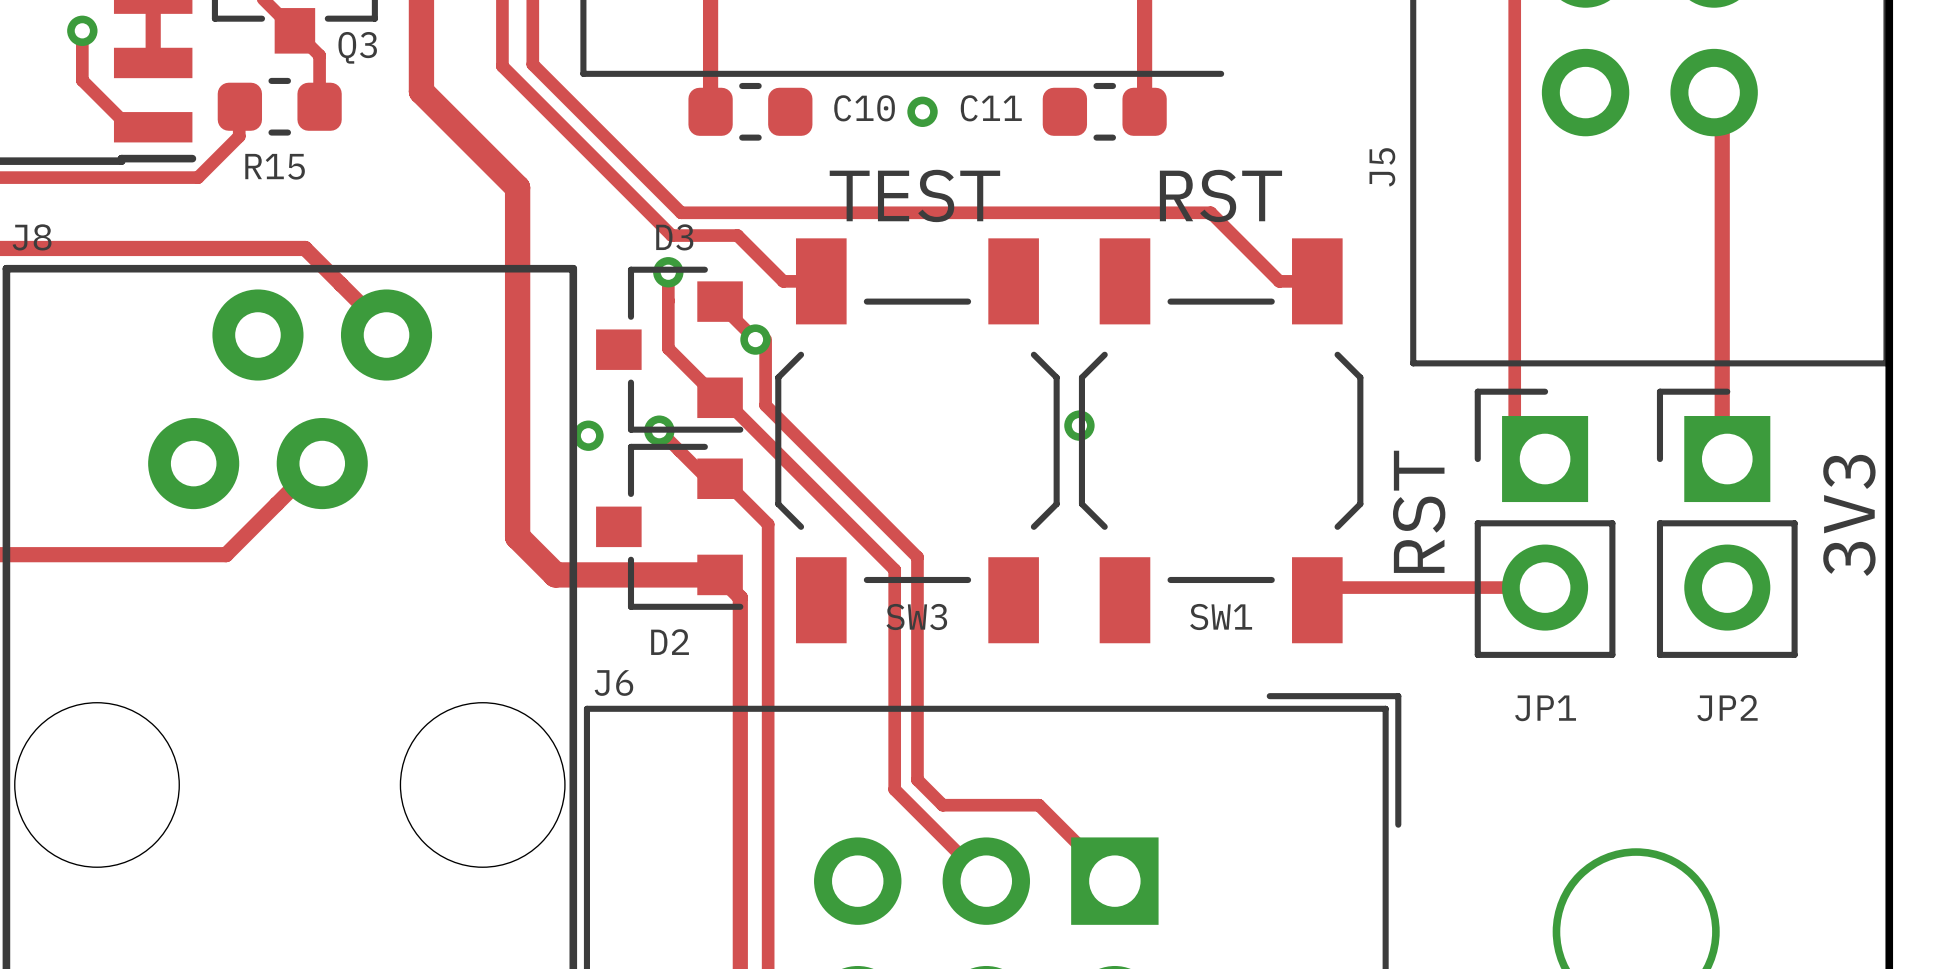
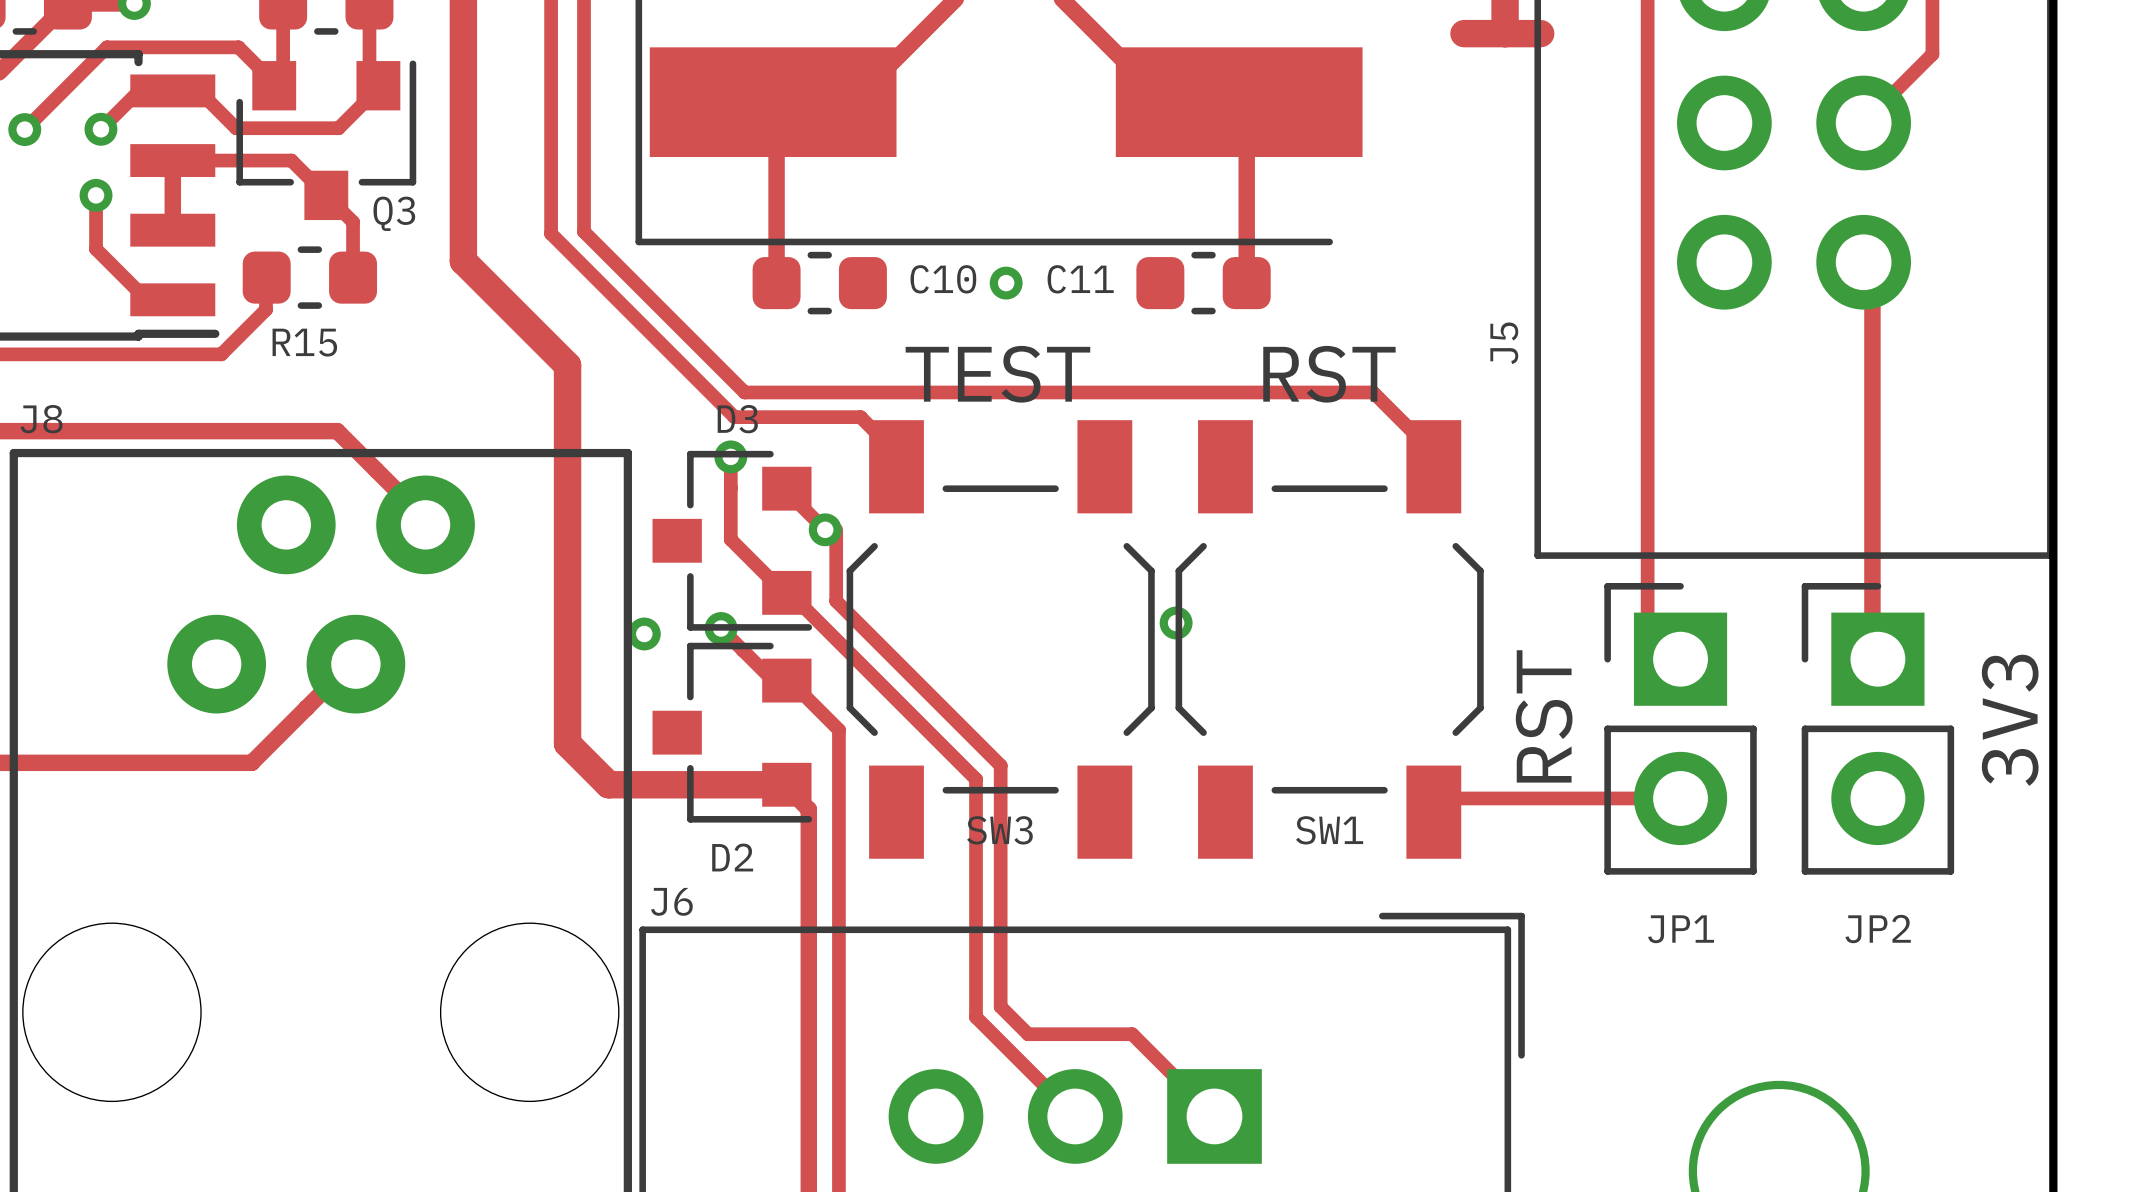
track: (1210, 212) (1279, 281) (1317, 281) -> (1318, 392) (1373, 392) (1433, 453) (1433, 466)
track: (737, 235) (783, 281) (821, 281) -> (805, 417) (860, 417) (896, 453) (896, 466)

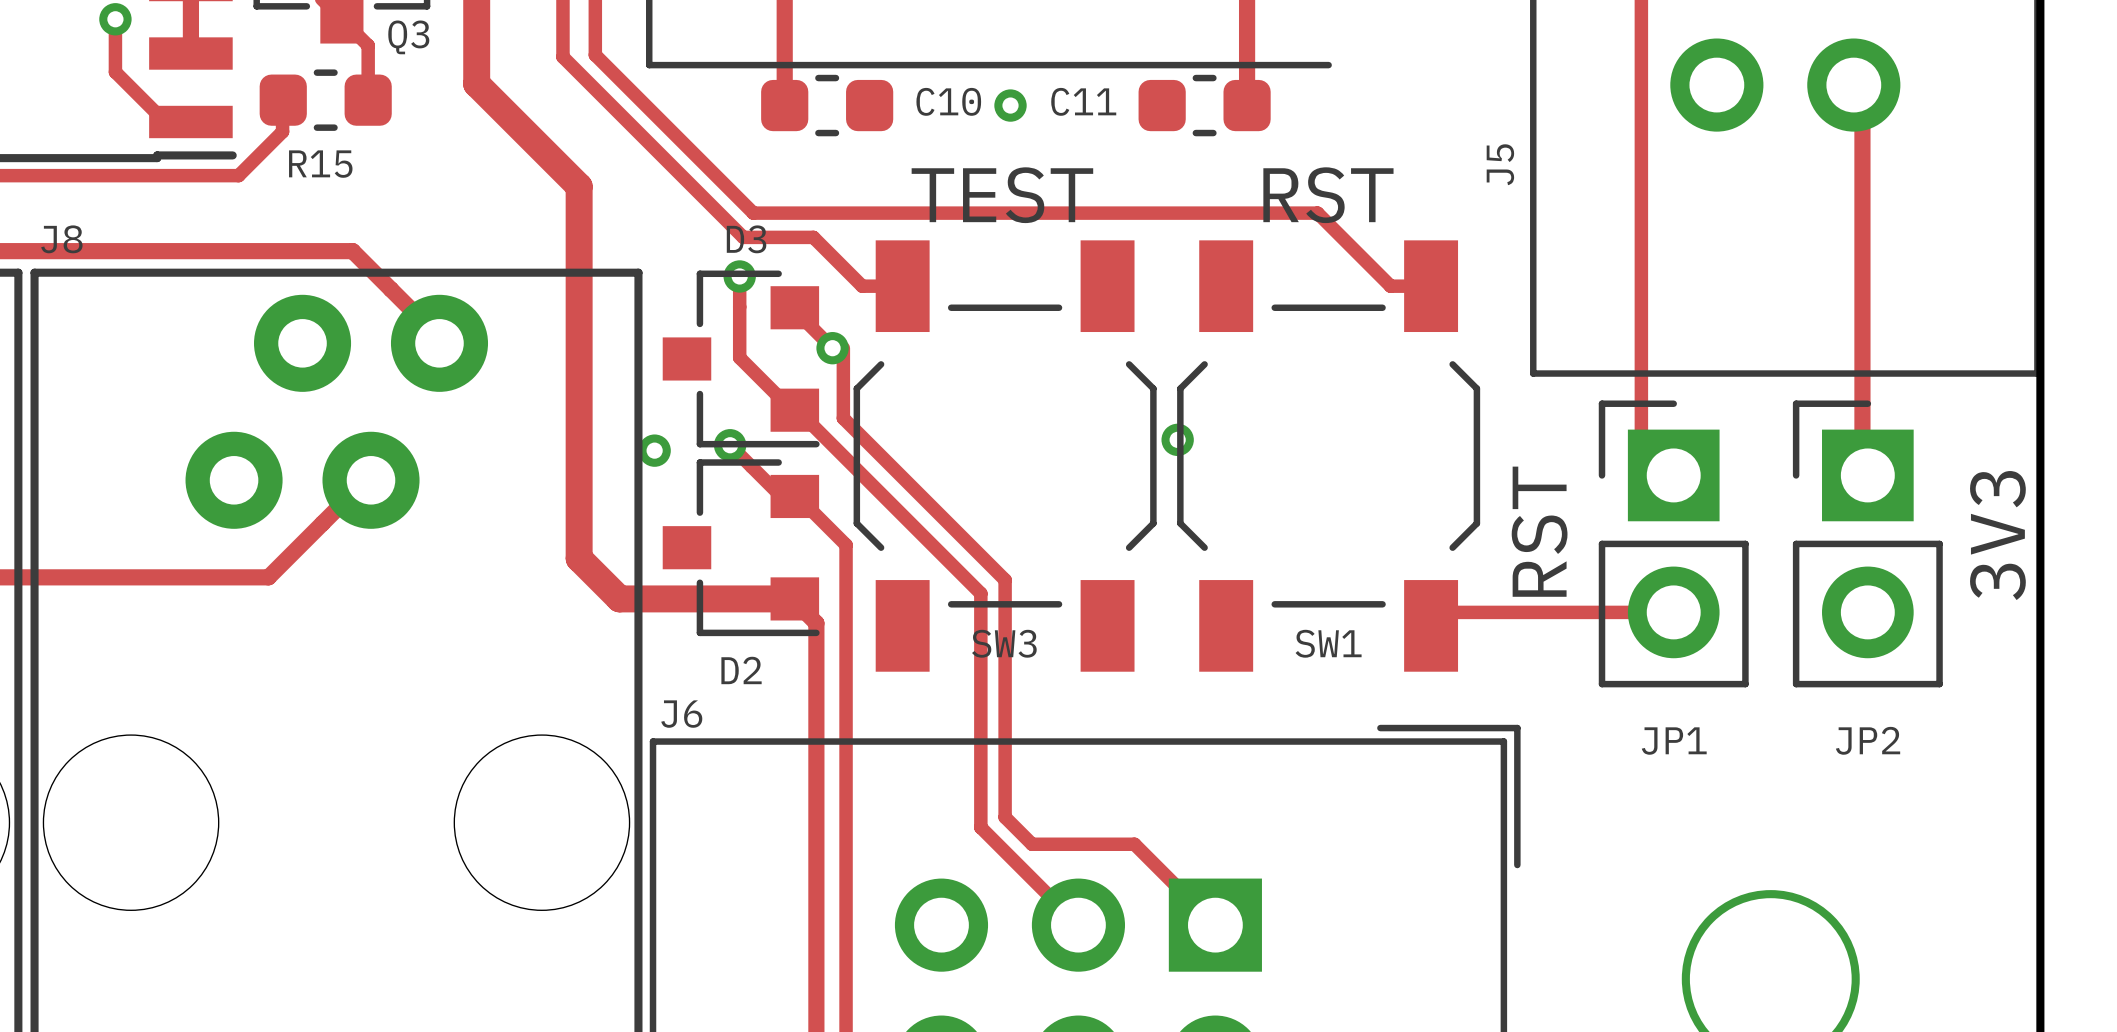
track: (1318, 392) (1373, 392) (1433, 453) (1433, 466) -> (1317, 213) (1390, 286) (1431, 286)
track: (805, 417) (860, 417) (896, 453) (896, 466) -> (813, 237) (862, 286) (902, 286)

